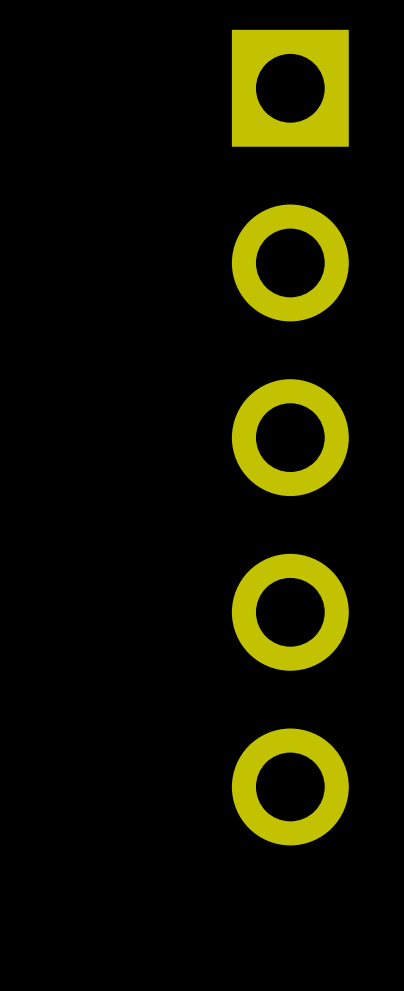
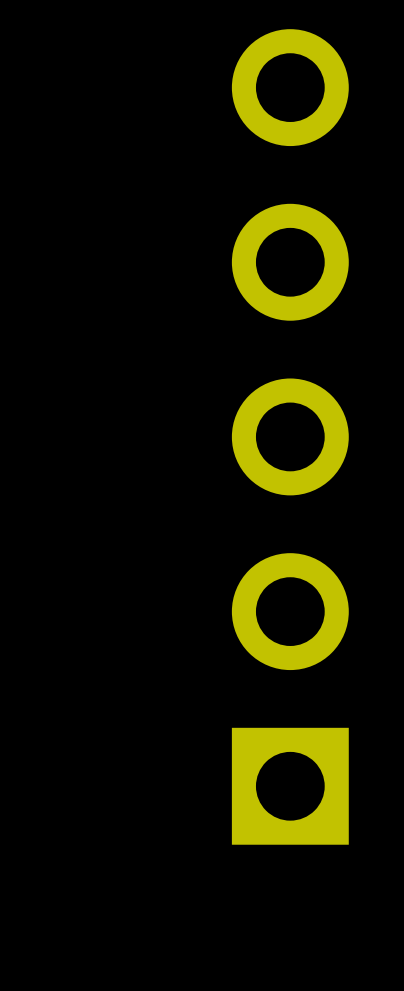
part rotation: 0° (290, 437) -> 180° (290, 436)

